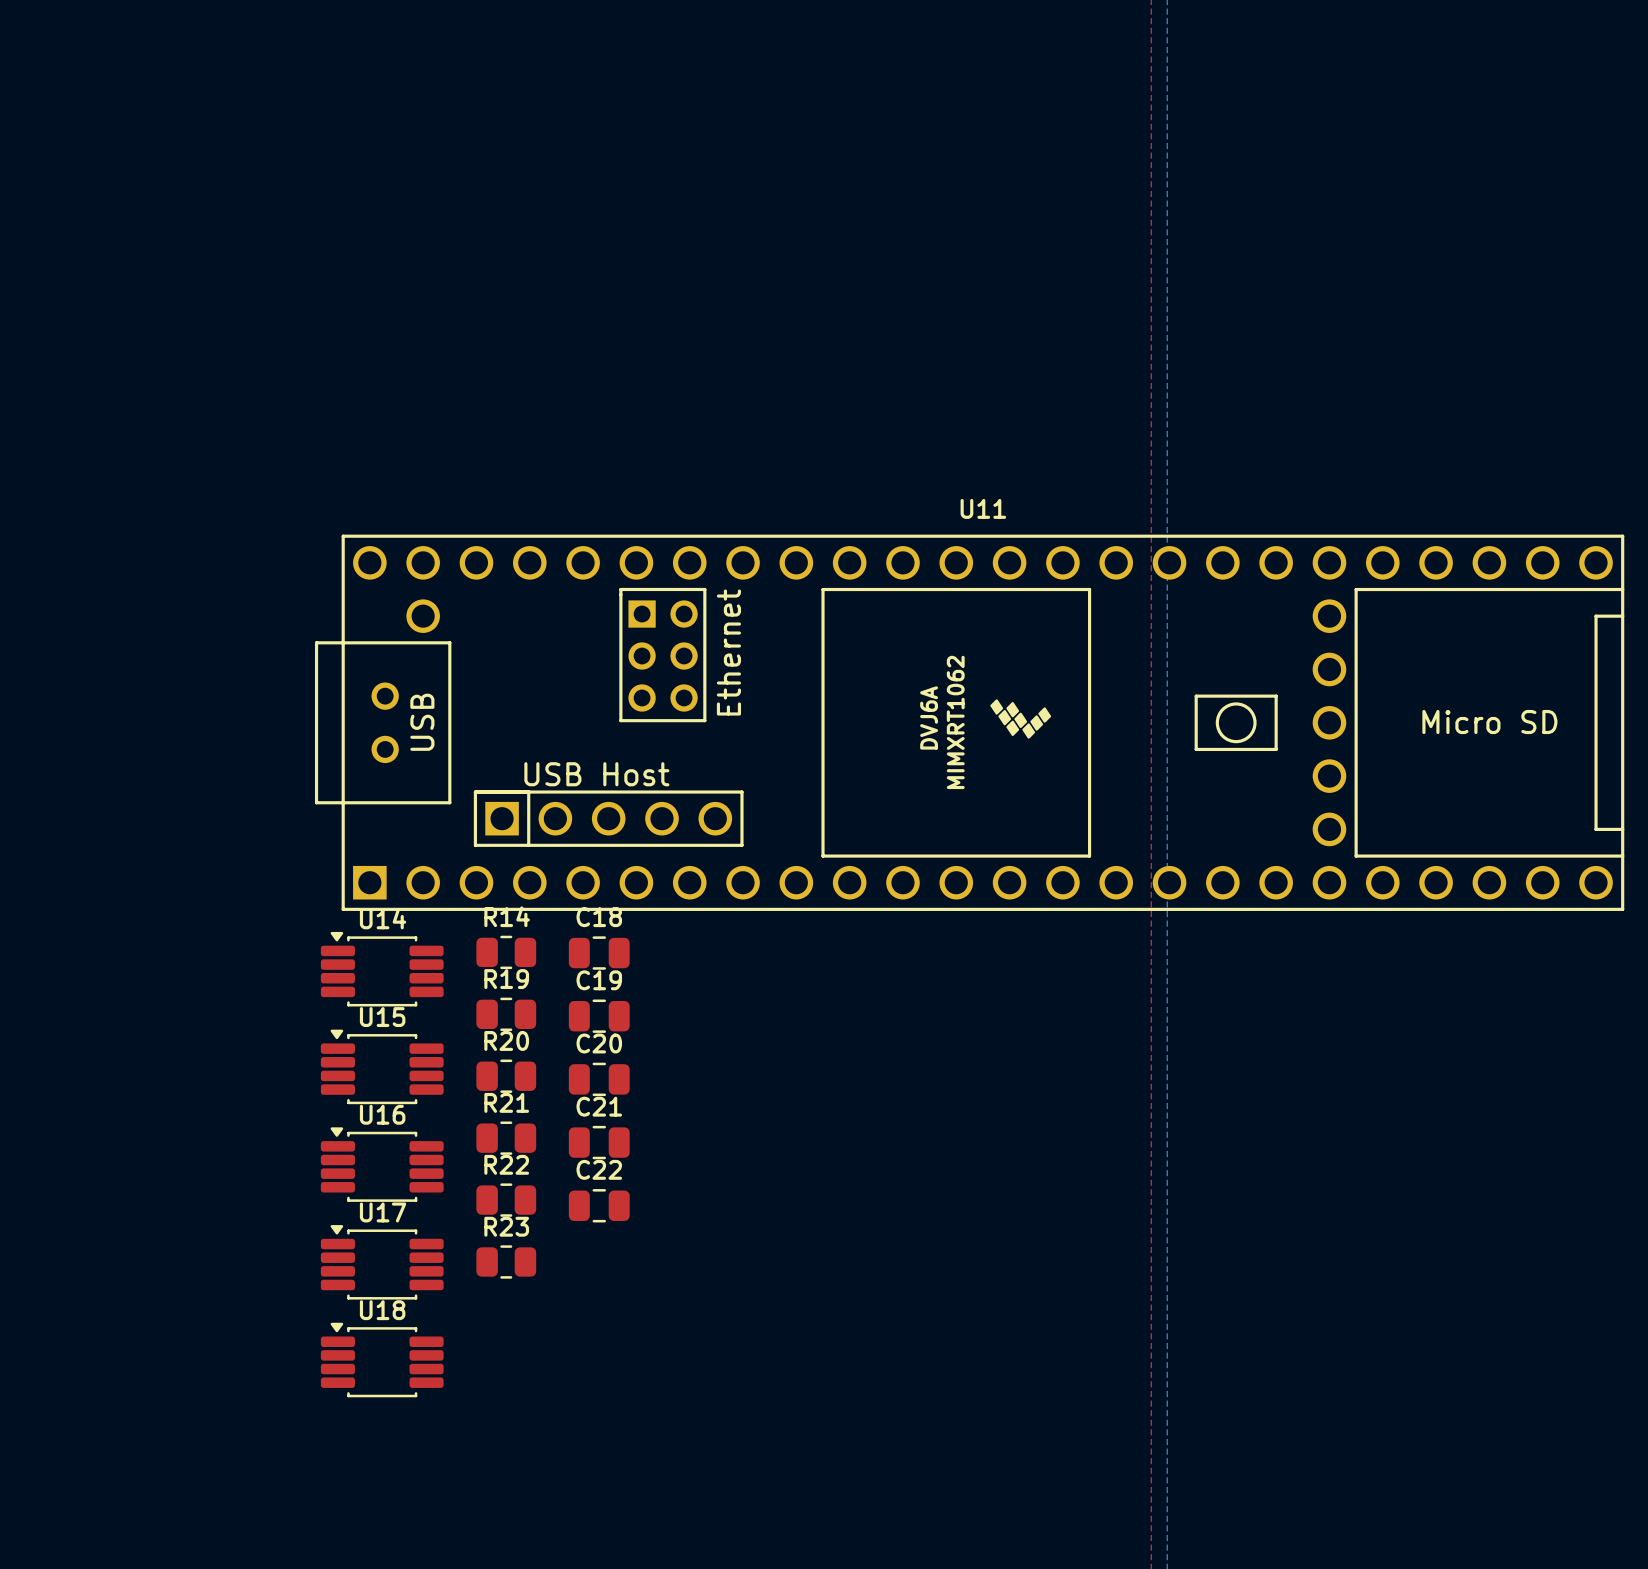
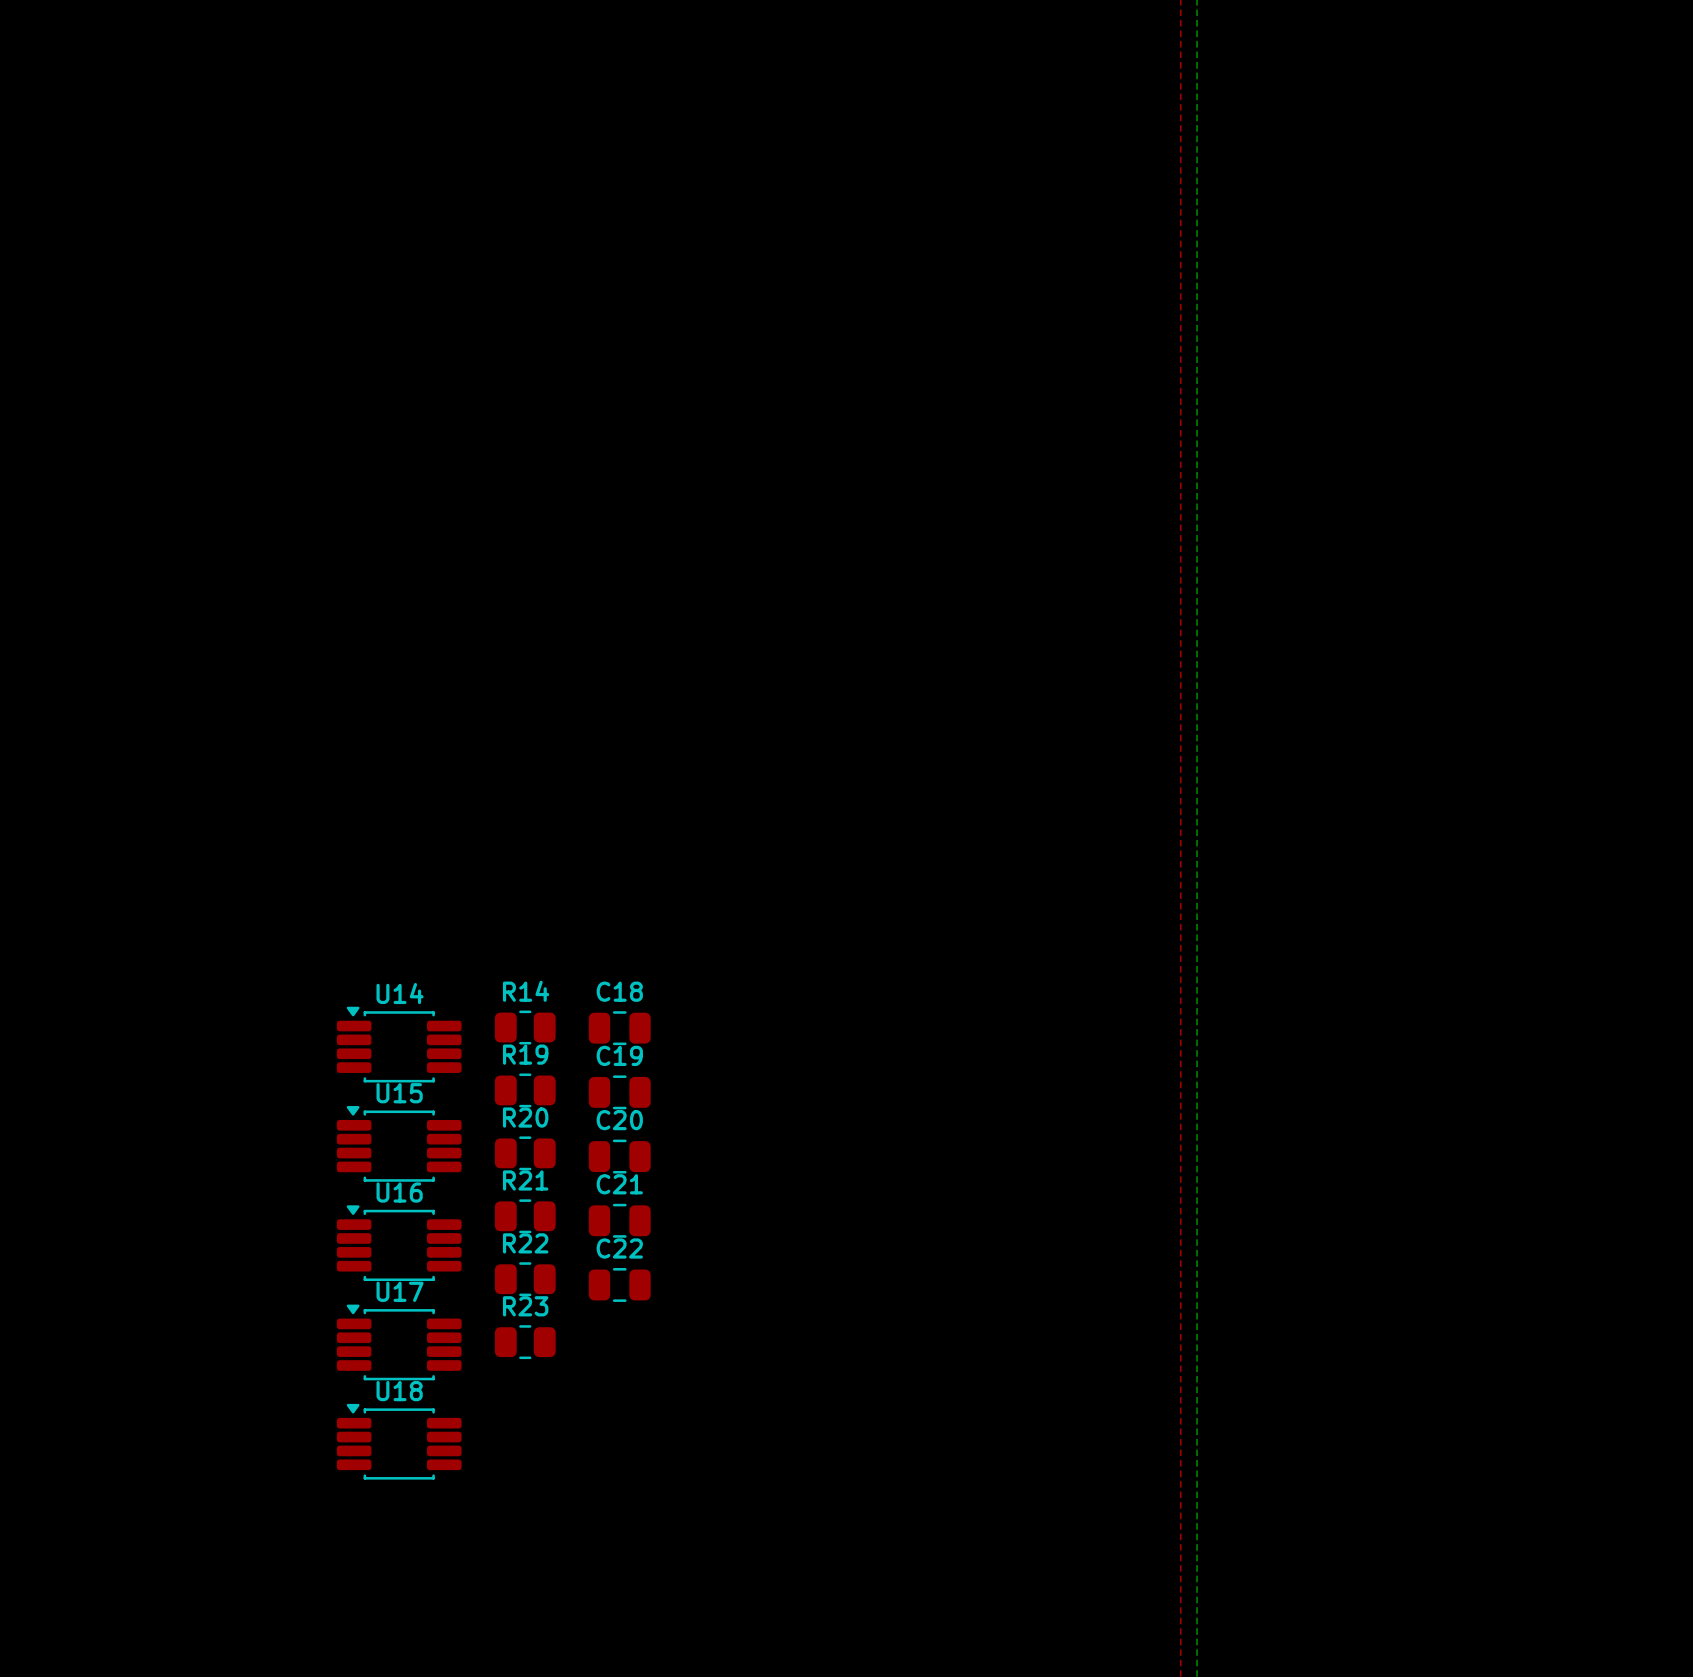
U11: (969, 722) -> none

